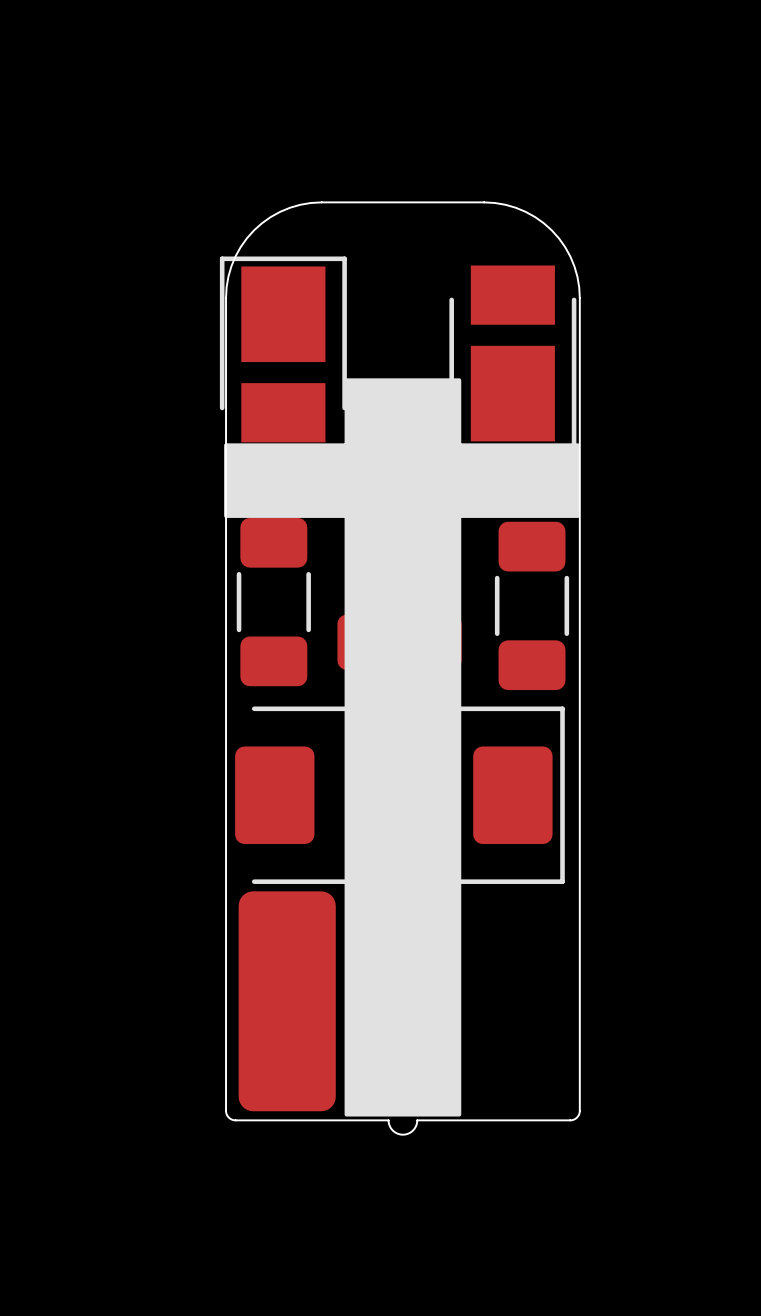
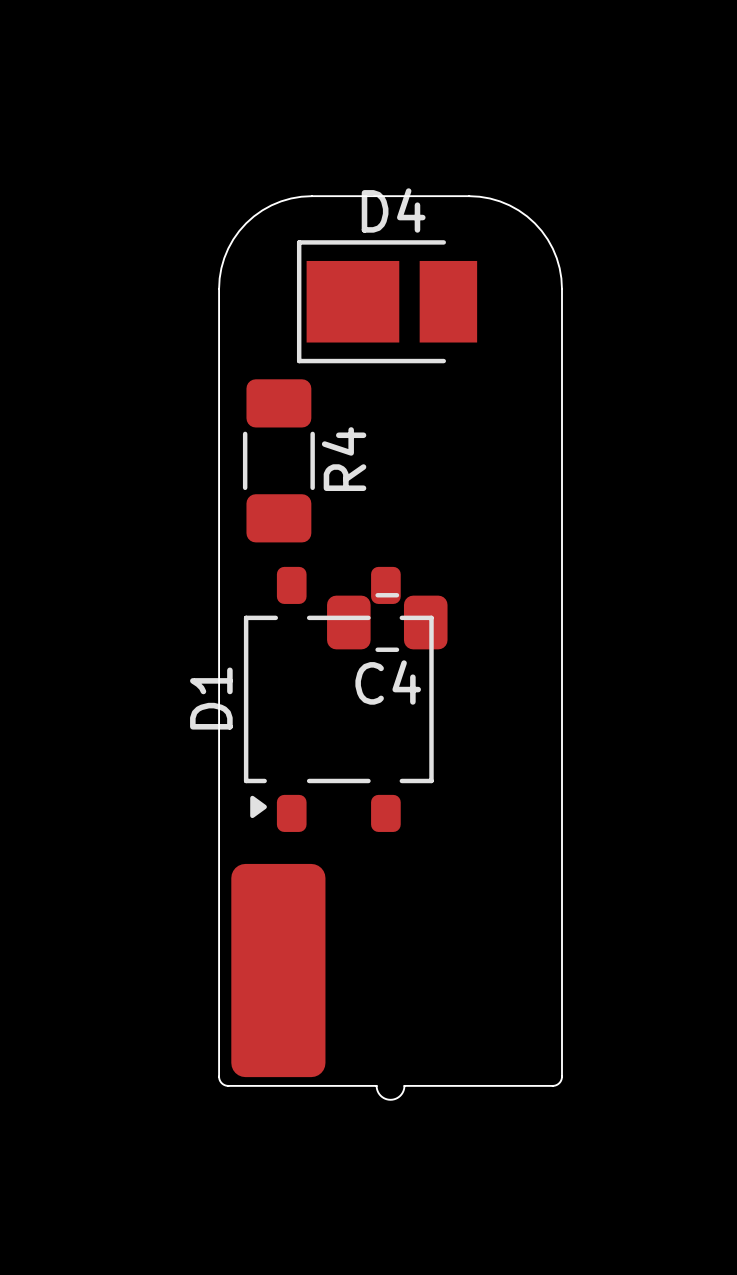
D4: none -> (387, 301)
part: (283, 349) -> none
part: (512, 358) -> none
drawing: [224, 378, 580, 1117] -> none
R4: none -> (278, 460)
part: (273, 602) -> none
part: (532, 605) -> none
D1: none -> (338, 699)
part: (399, 795) -> none

